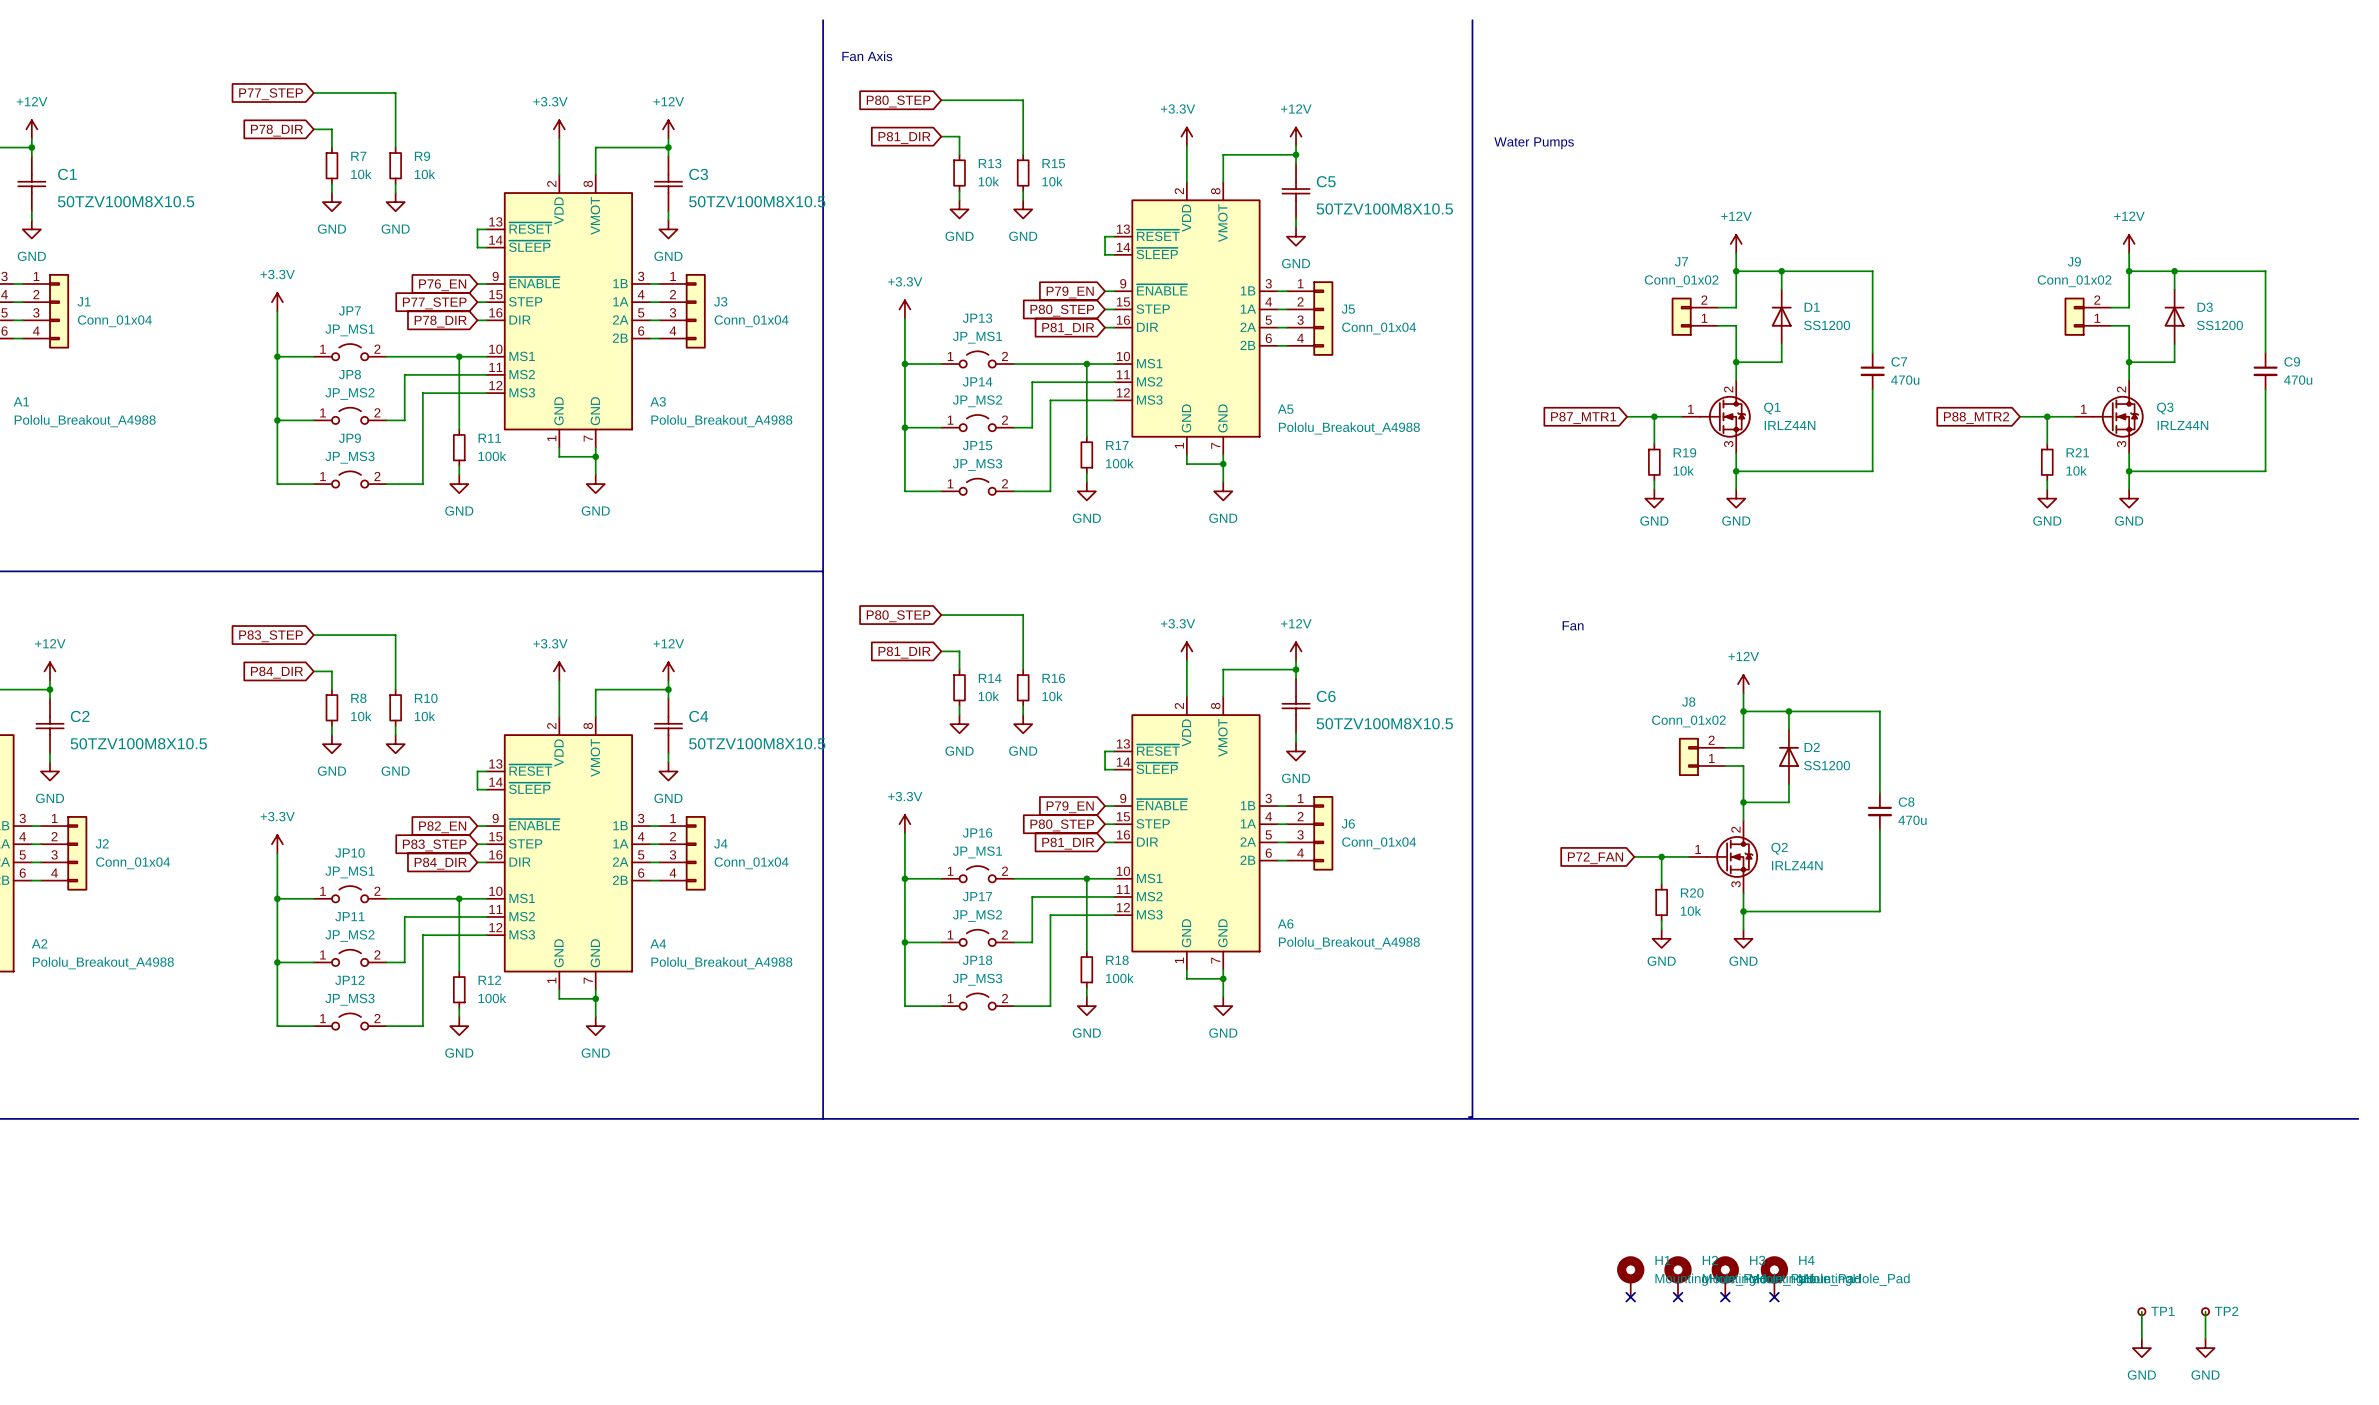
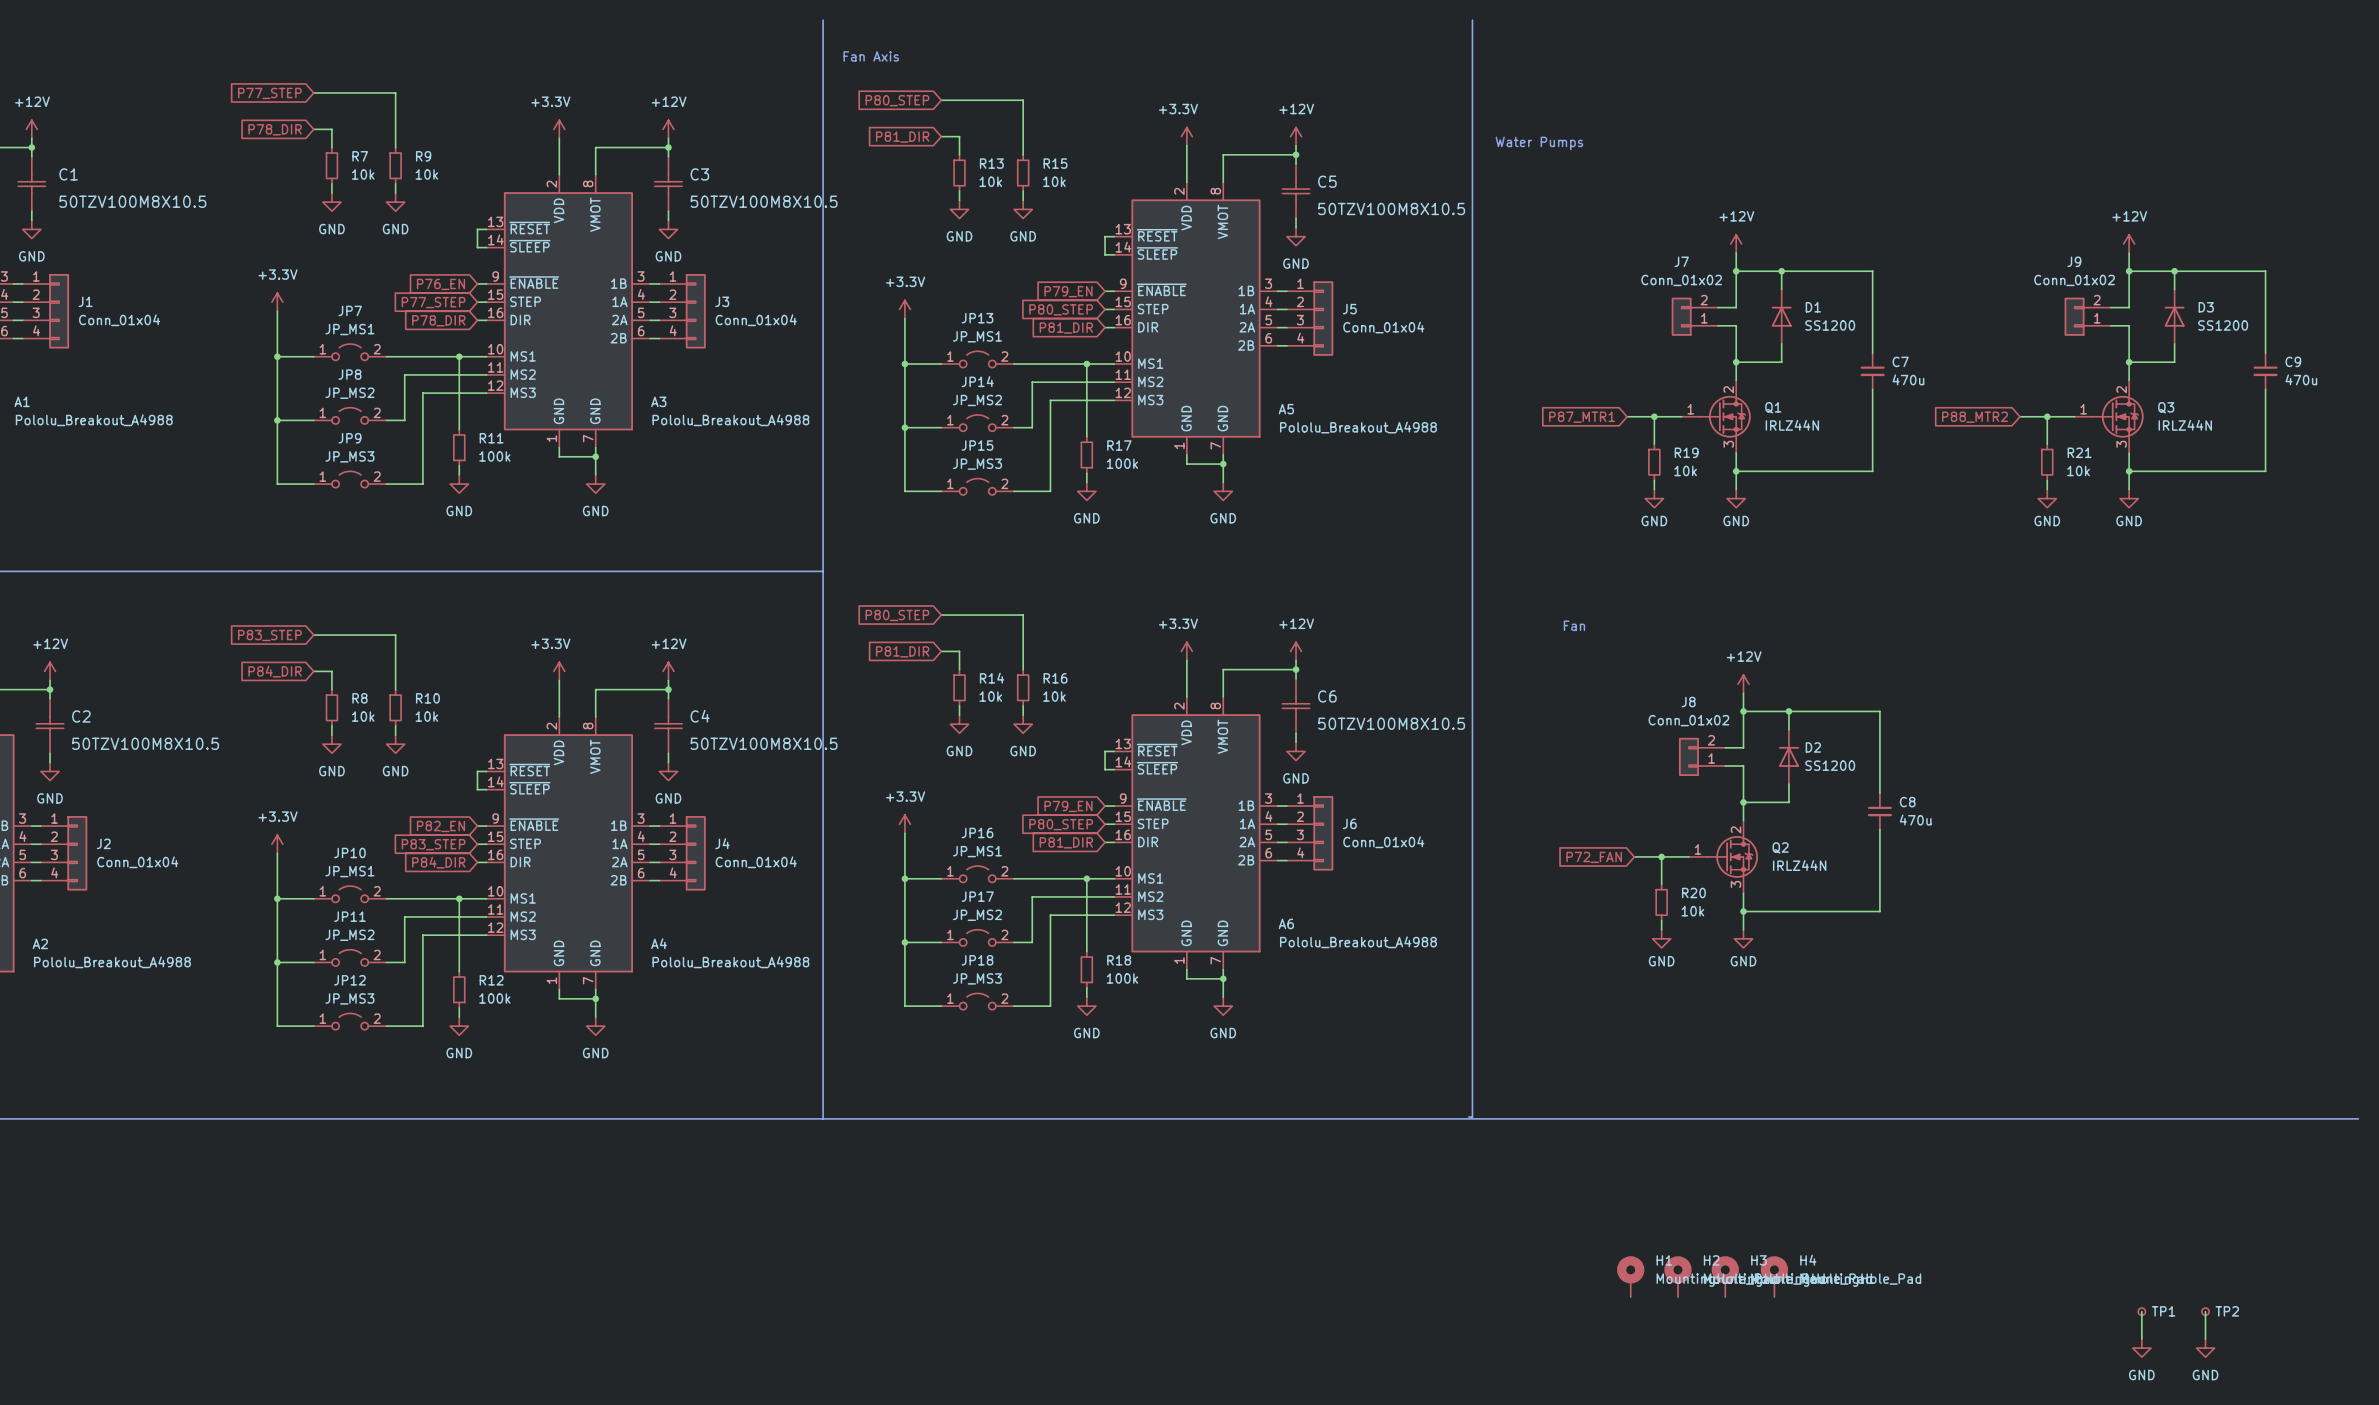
no-connect mark: (1630, 1297) -> none
no-connect mark: (1678, 1297) -> none
no-connect mark: (1725, 1297) -> none
no-connect mark: (1774, 1297) -> none

